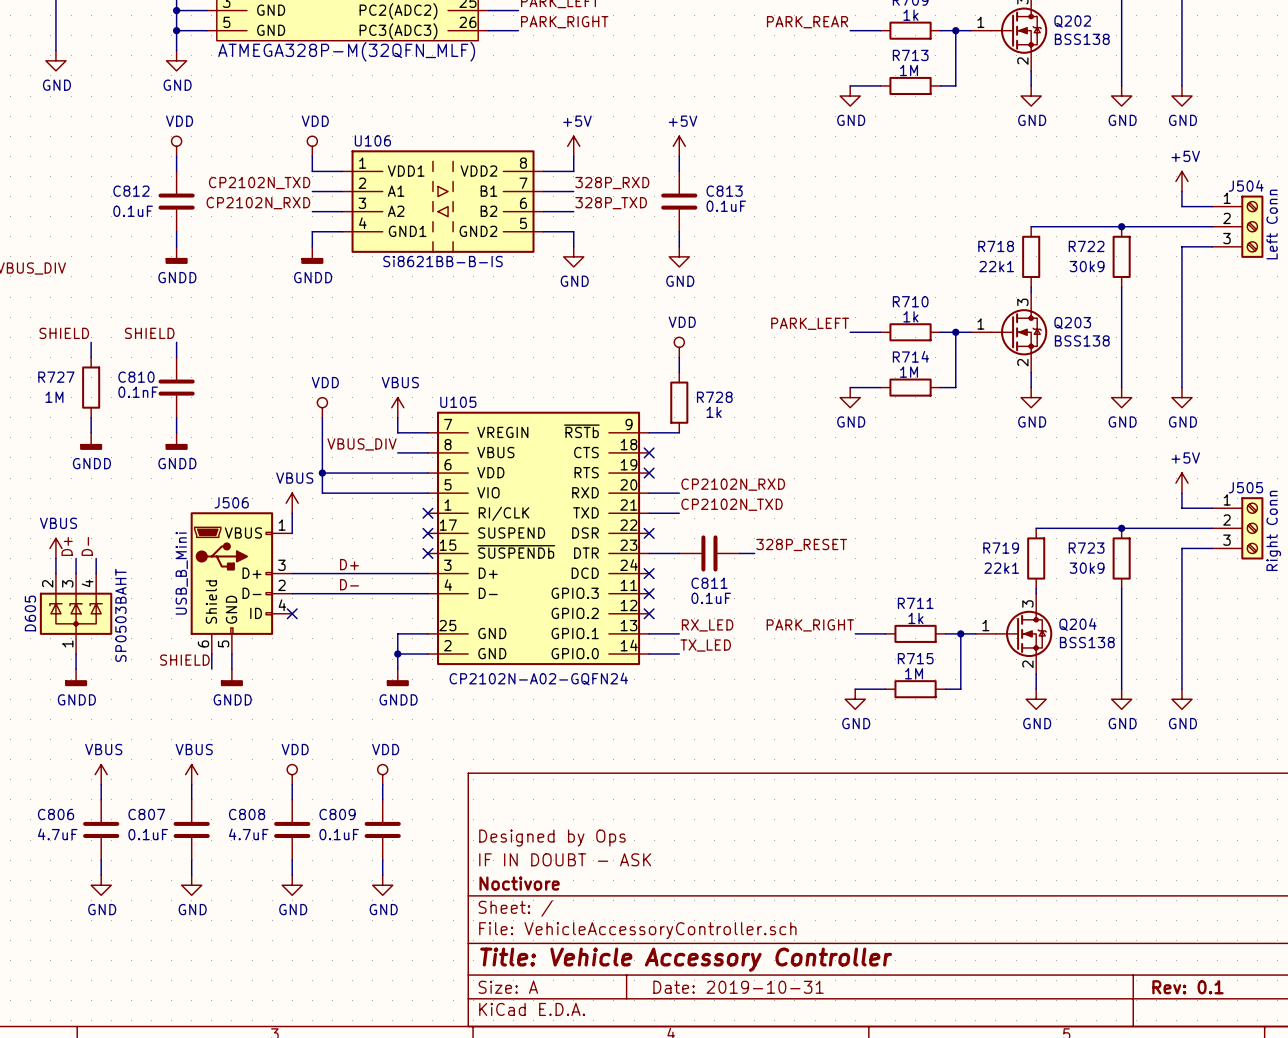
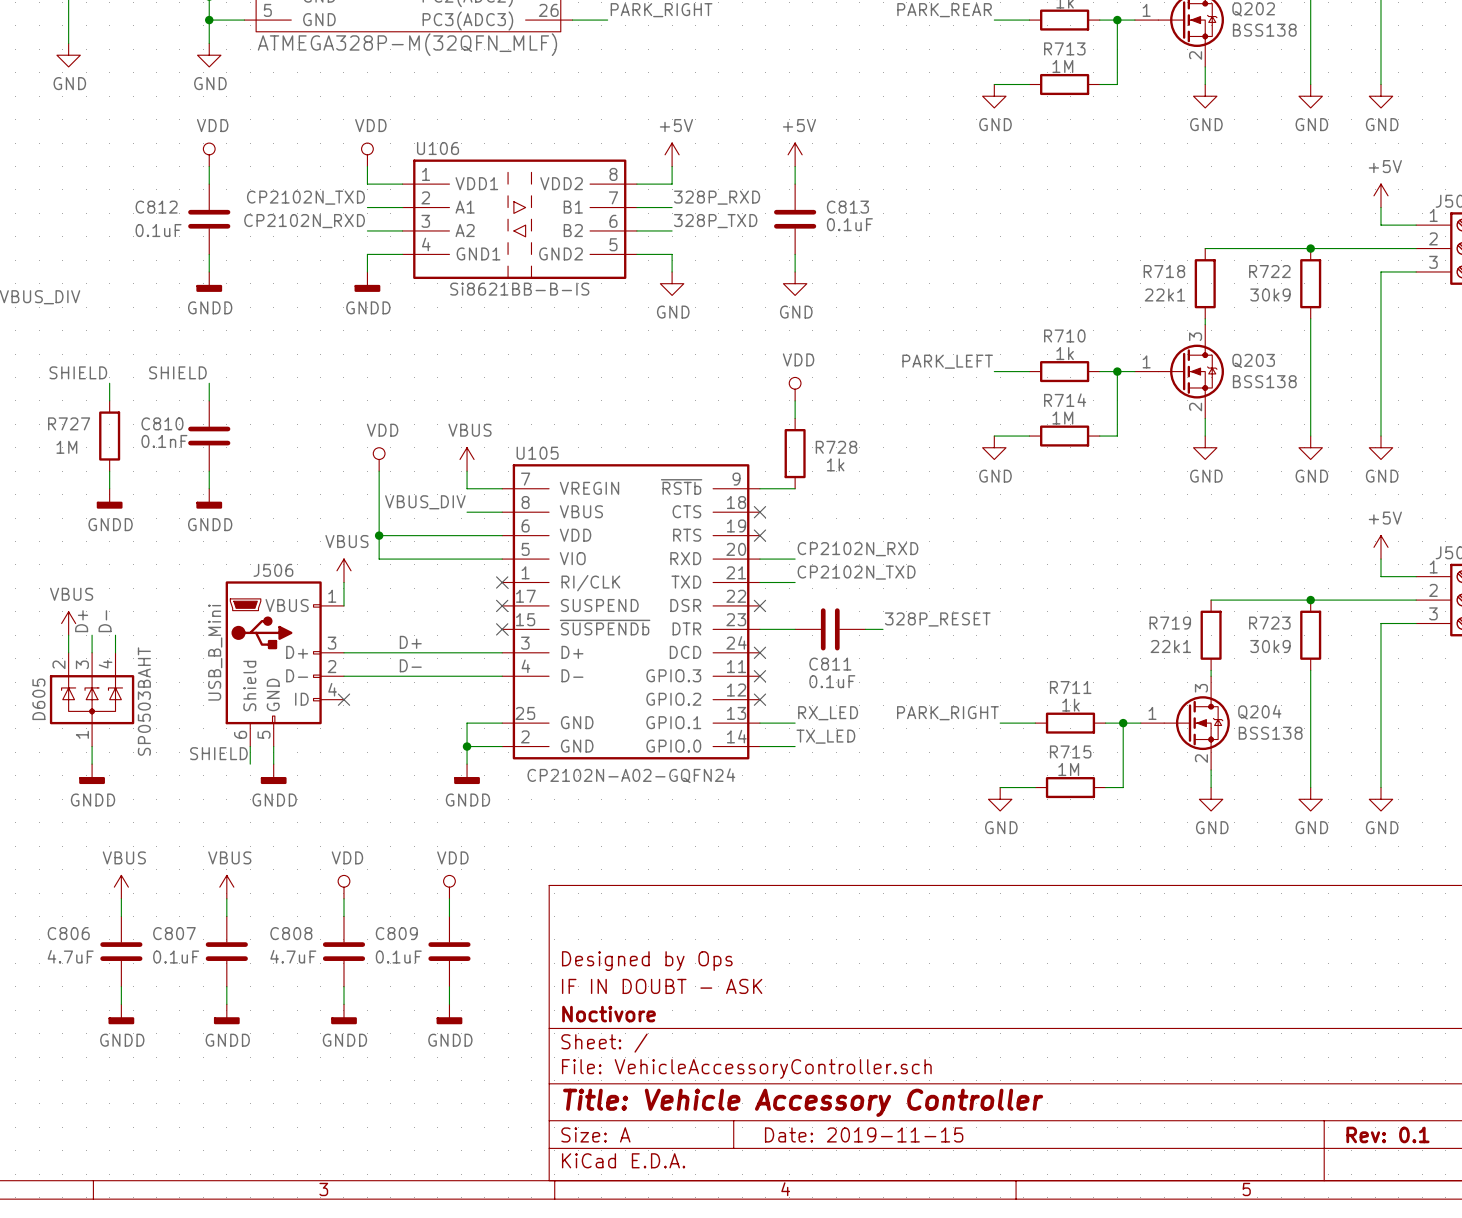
power symbol: GND (101, 885) -> GNDD (121, 1014)
power symbol: GND (191, 885) -> GNDD (226, 1014)
power symbol: GND (292, 885) -> GNDD (343, 1014)
power symbol: GND (382, 885) -> GNDD (449, 1014)
title block: Date: 2019-10-31 (738, 987) -> Date: 2019-11-15 (864, 1134)

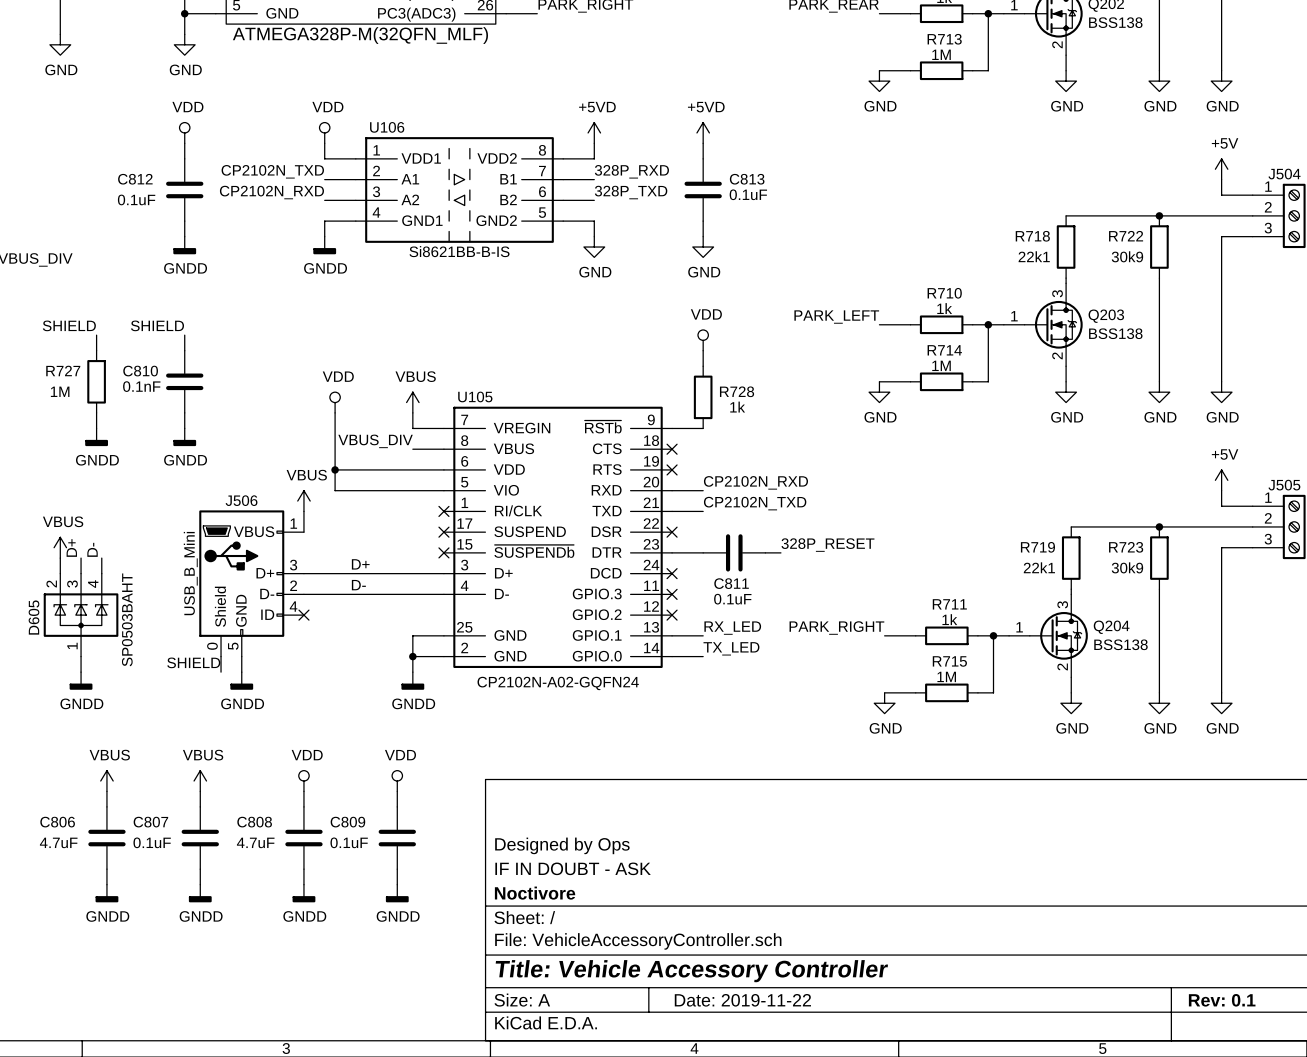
power symbol: +5V (672, 154) -> +5VD (594, 132)
power symbol: +5V (795, 154) -> +5VD (703, 132)
J506 pin number: 6 (240, 734) -> 0 (212, 646)
title block: Date: 2019-11-15 (864, 1134) -> Date: 2019-11-22 (742, 1000)

